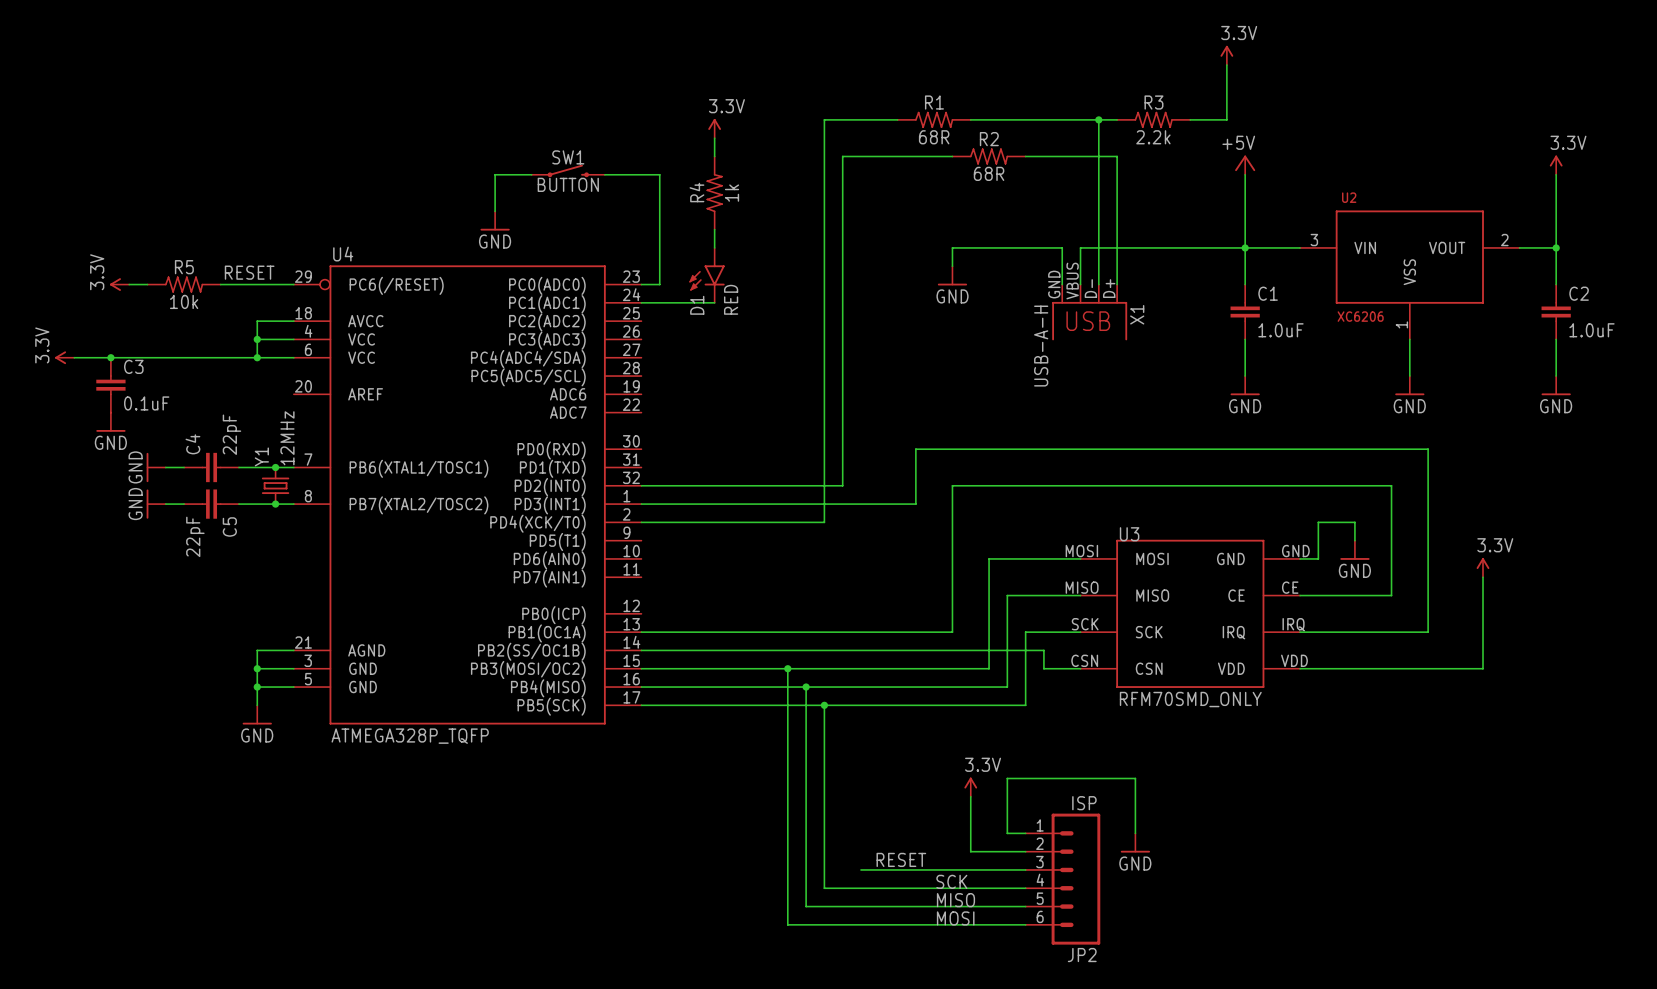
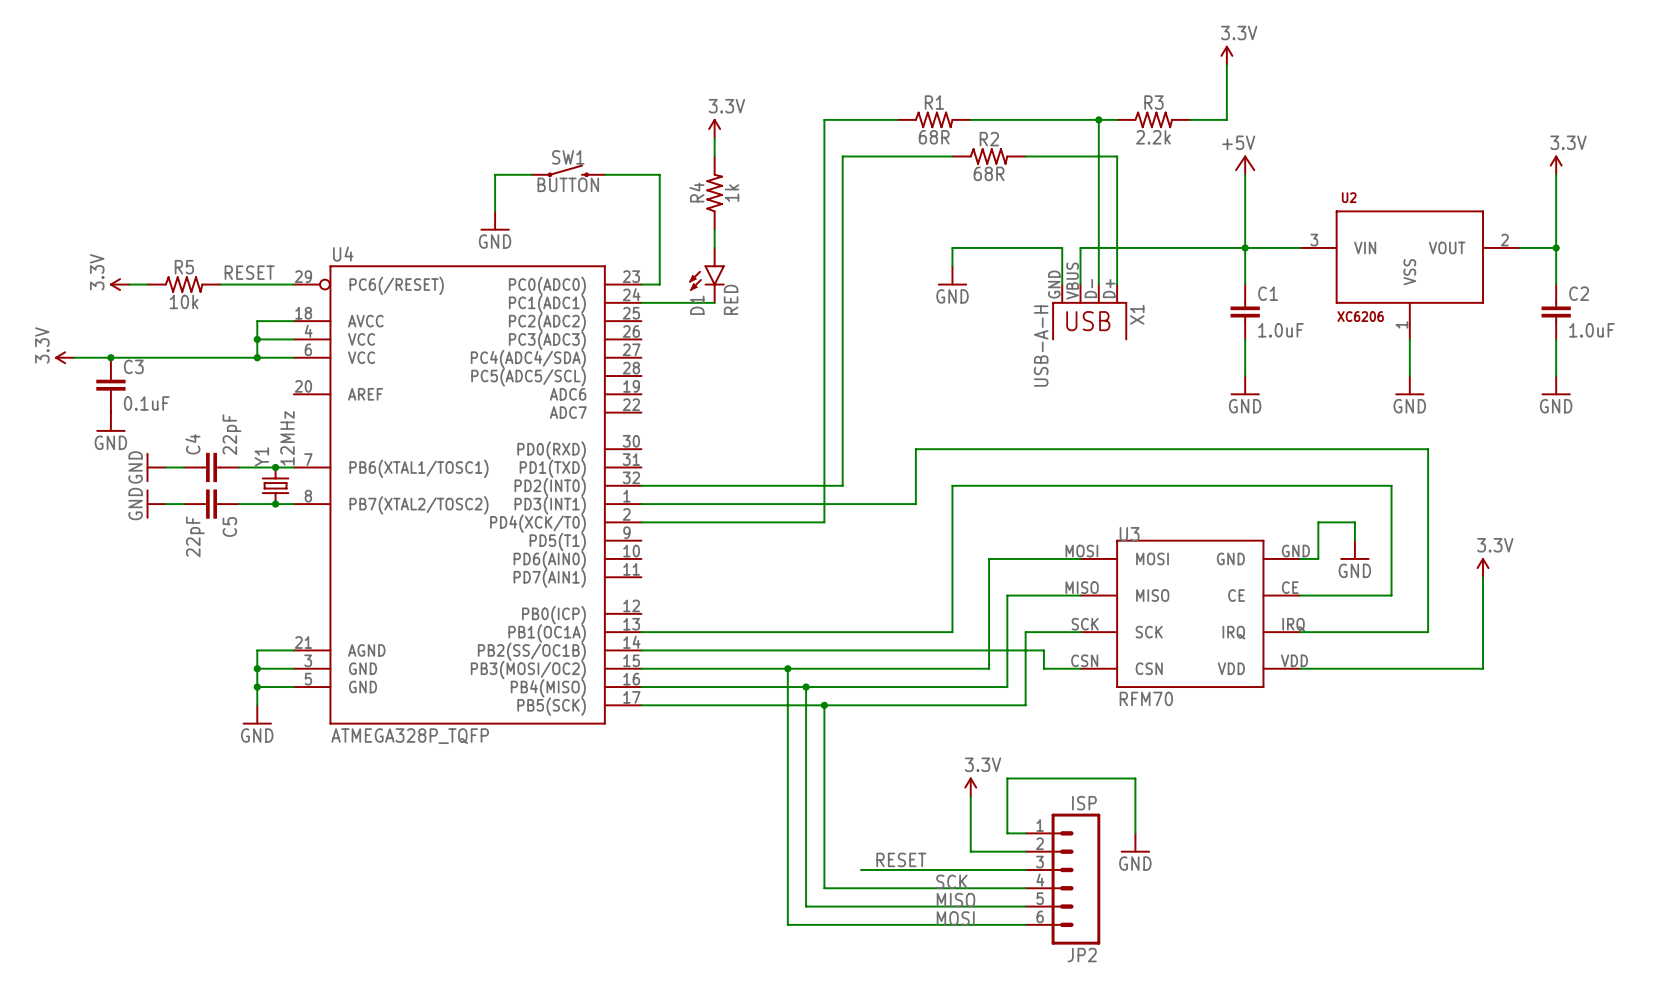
U3 value: RFM70SMD_ONLY (1190, 699) -> RFM70 (1146, 698)

